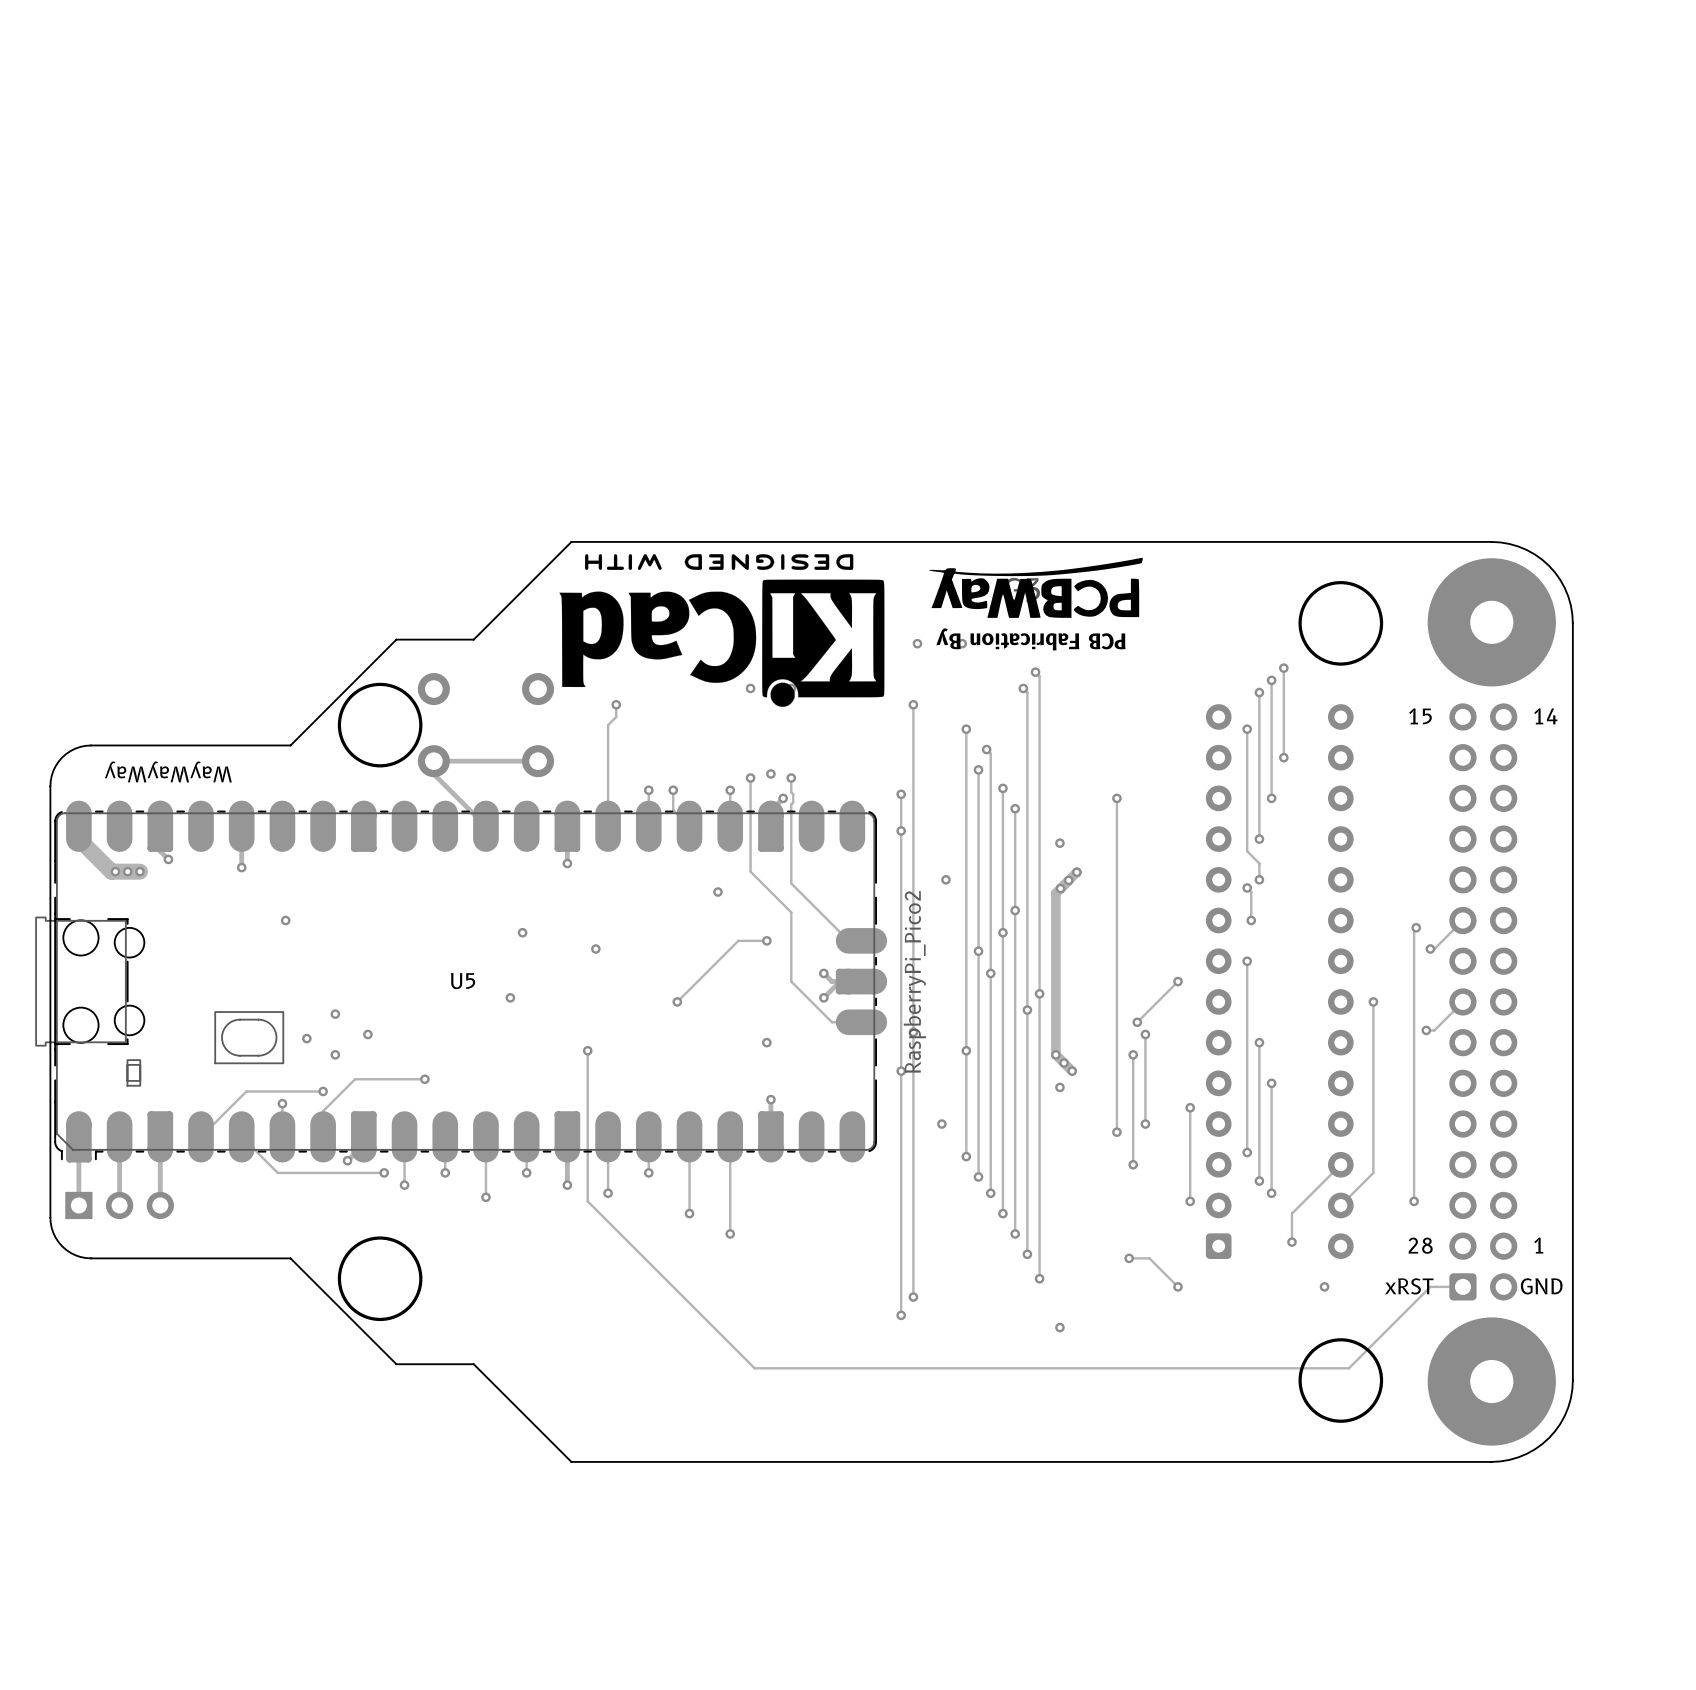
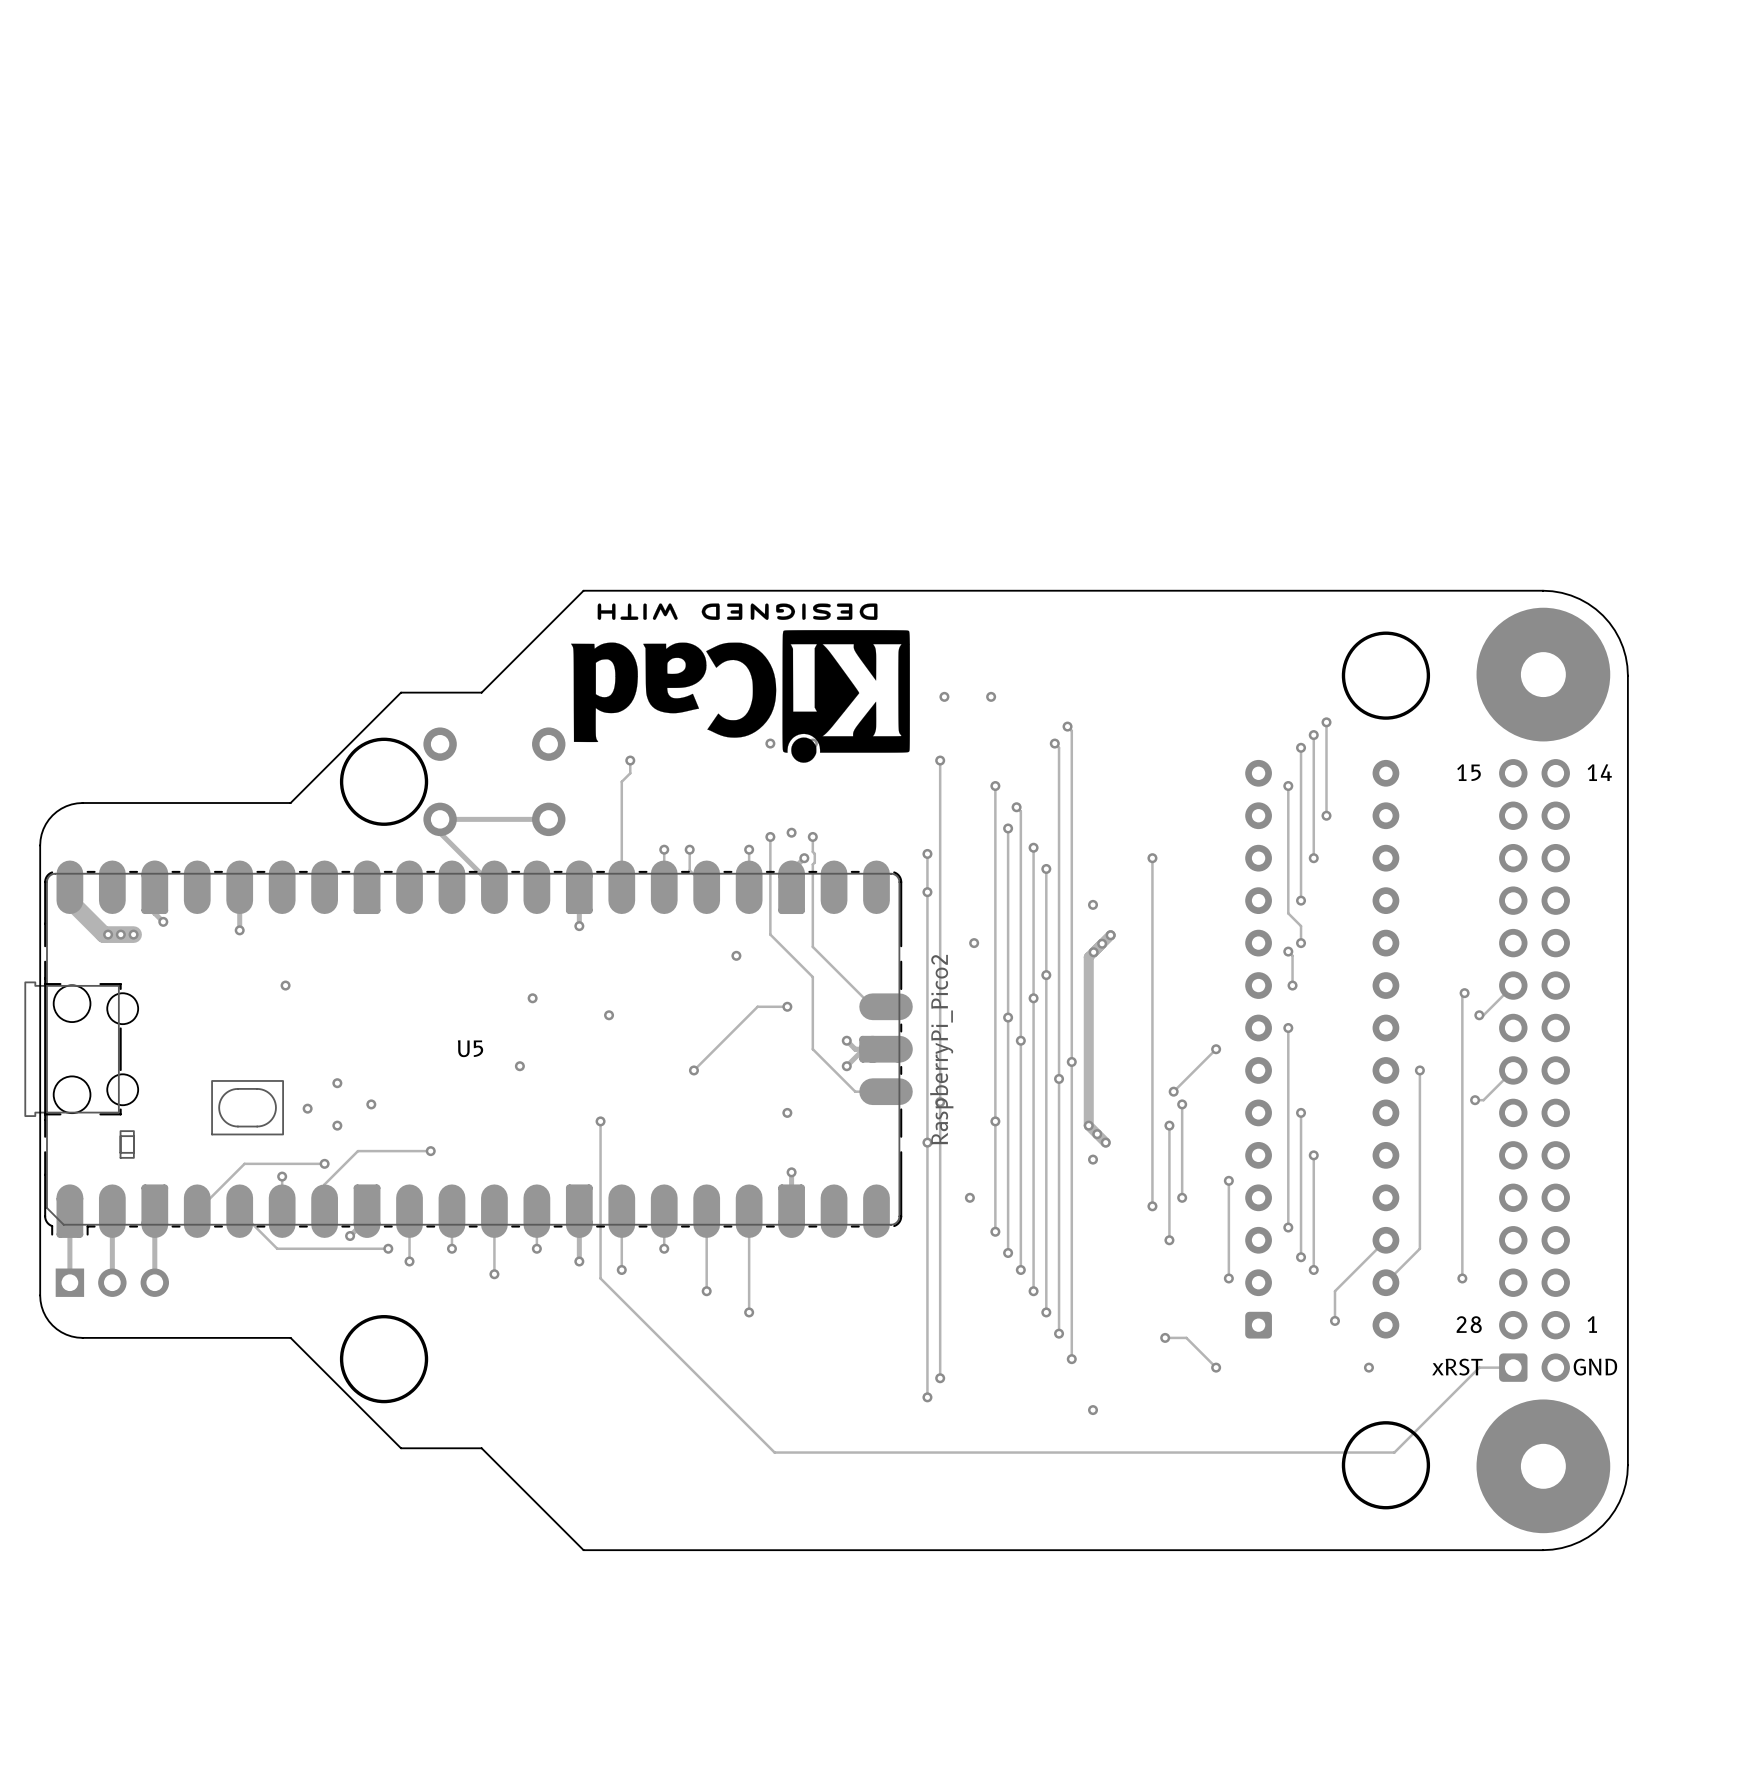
part: (1035, 587) -> none
text: PCB Fabrication By (1030, 639) -> none
text: WayWayWay (168, 772) -> none

